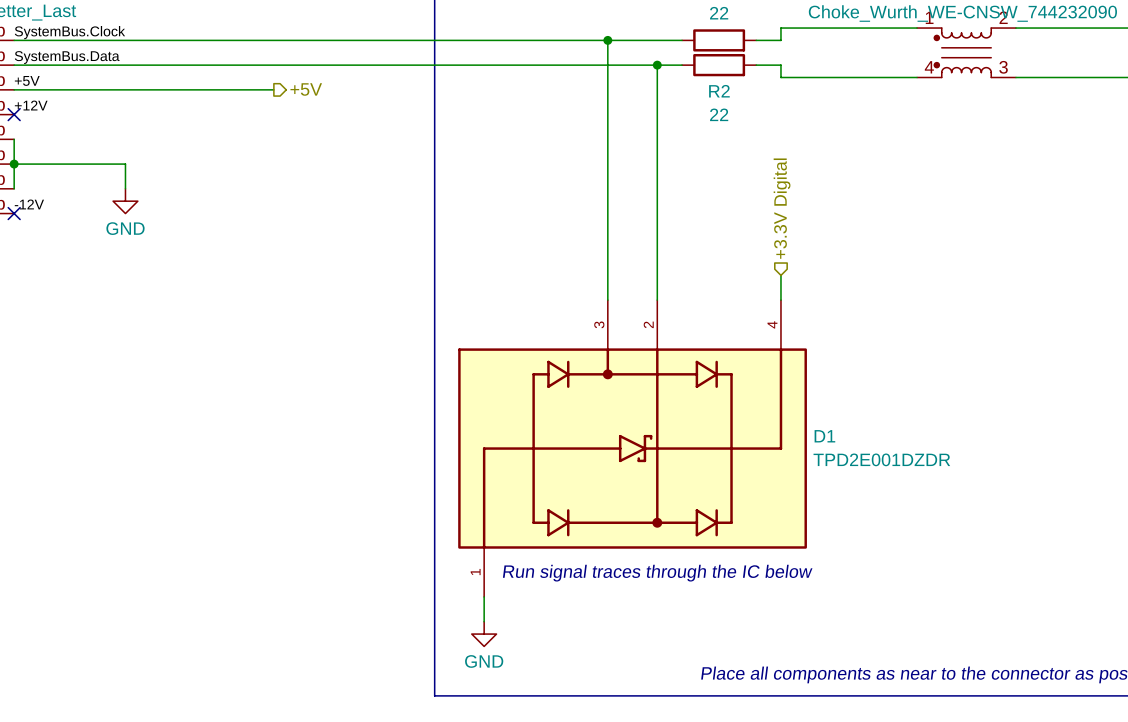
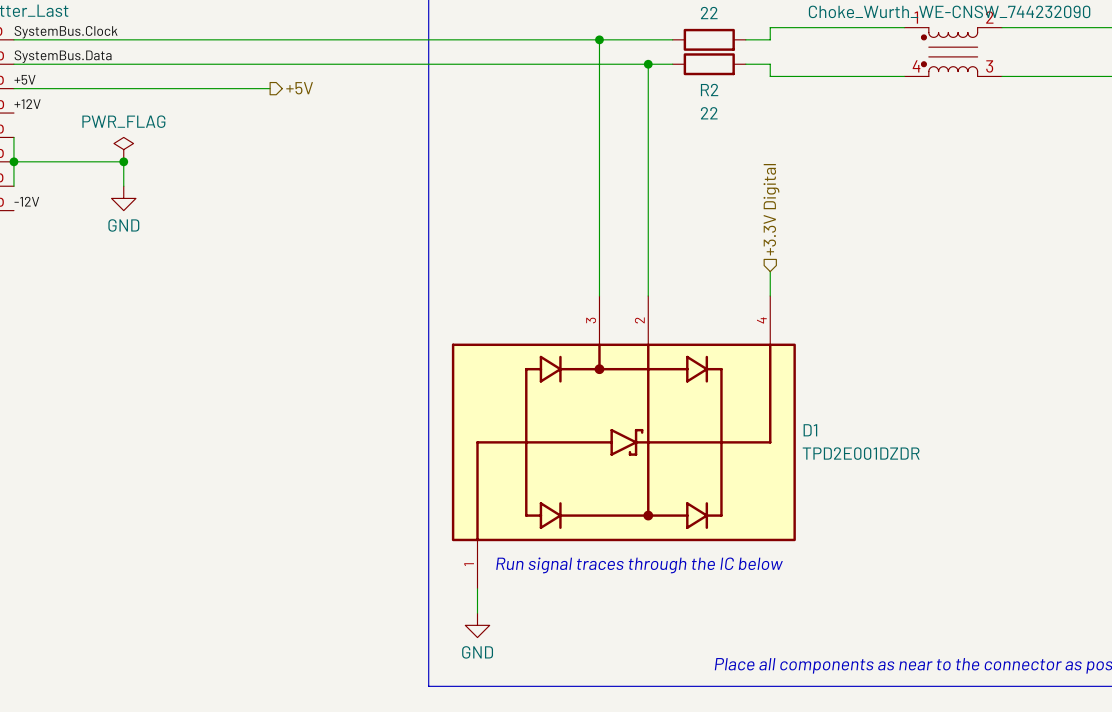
no-connect mark: (14, 114) -> none
power symbol: none -> PWR_FLAG (123, 149)
junction: none -> (123, 161)
no-connect mark: (14, 213) -> none

